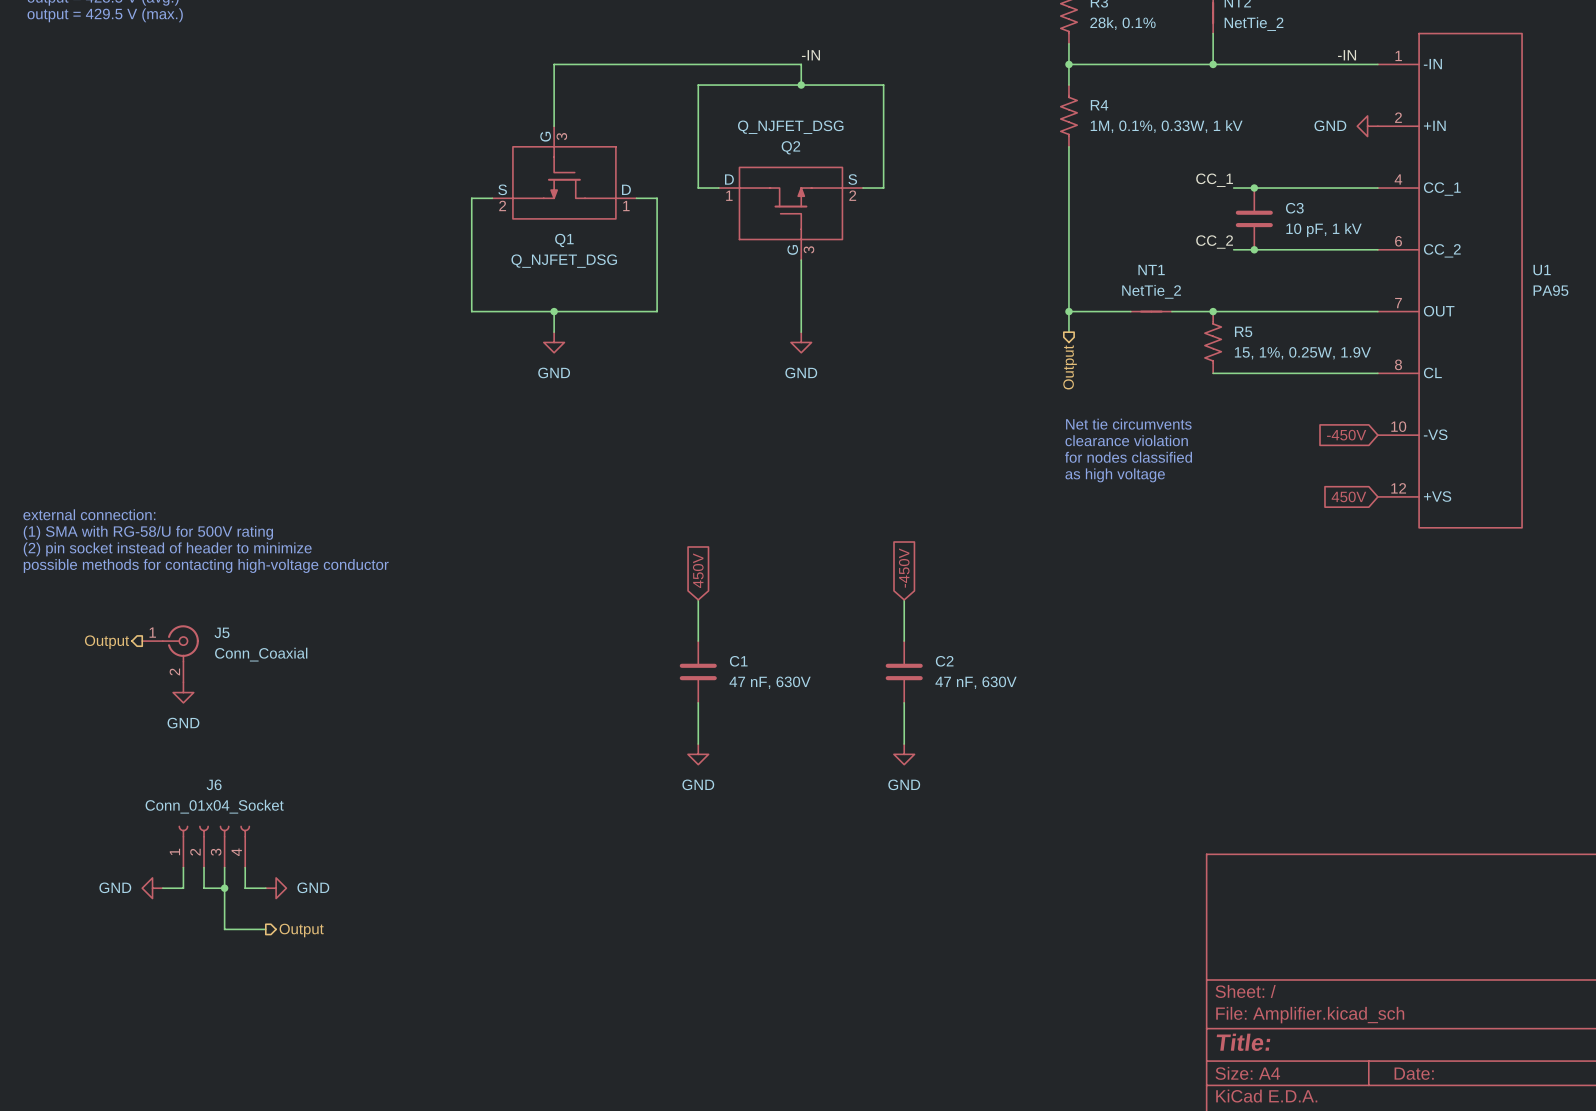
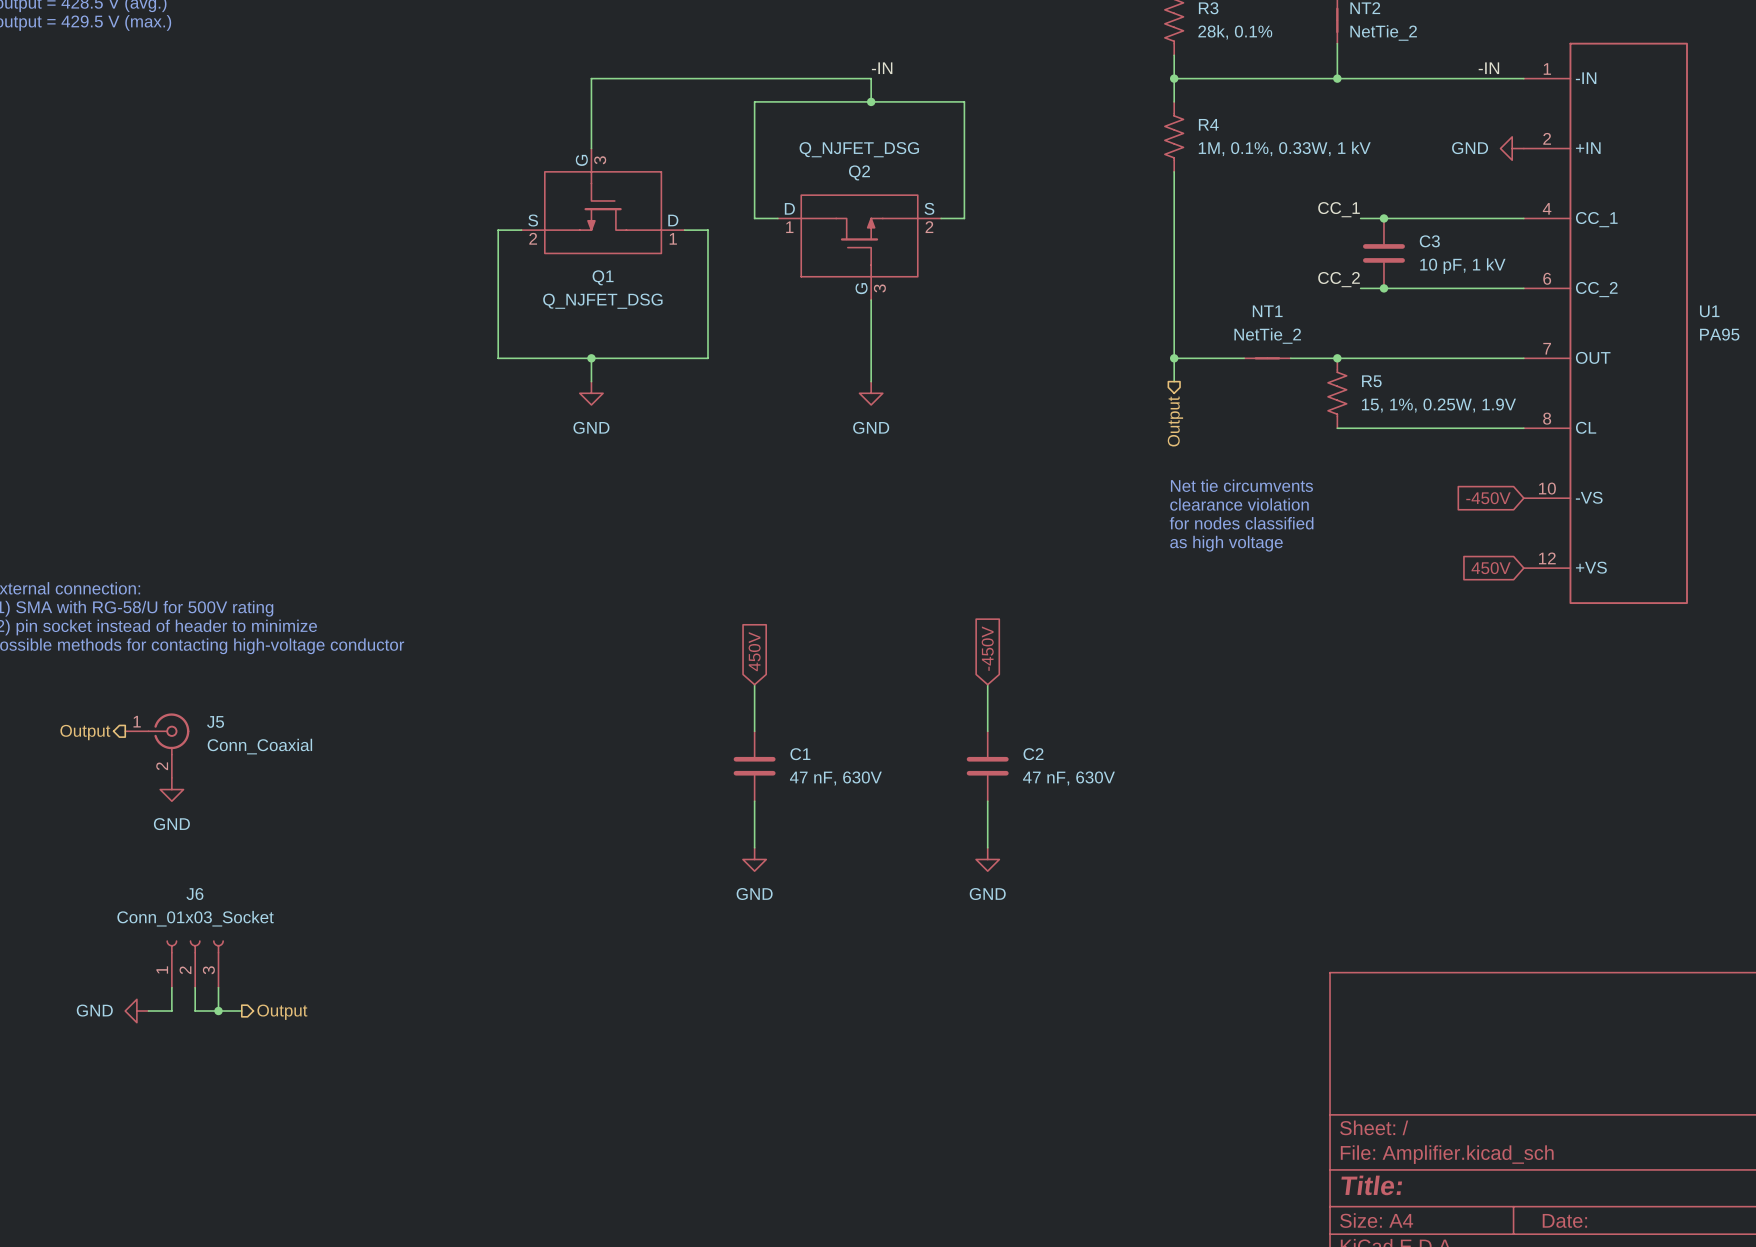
J6 value: Conn_01x04_Socket (214, 806) -> Conn_01x03_Socket (195, 918)
J6 symbol: [178, 825, 250, 868] -> [166, 940, 224, 988]
wire: (245, 867) (245, 888) (265, 888) -> none
wire: (224, 888) (224, 929) (265, 929) -> (218, 1011) (241, 1011)
power symbol: GND (276, 888) -> none
hierarchical label position: Output (301, 930) -> Output (282, 1012)

